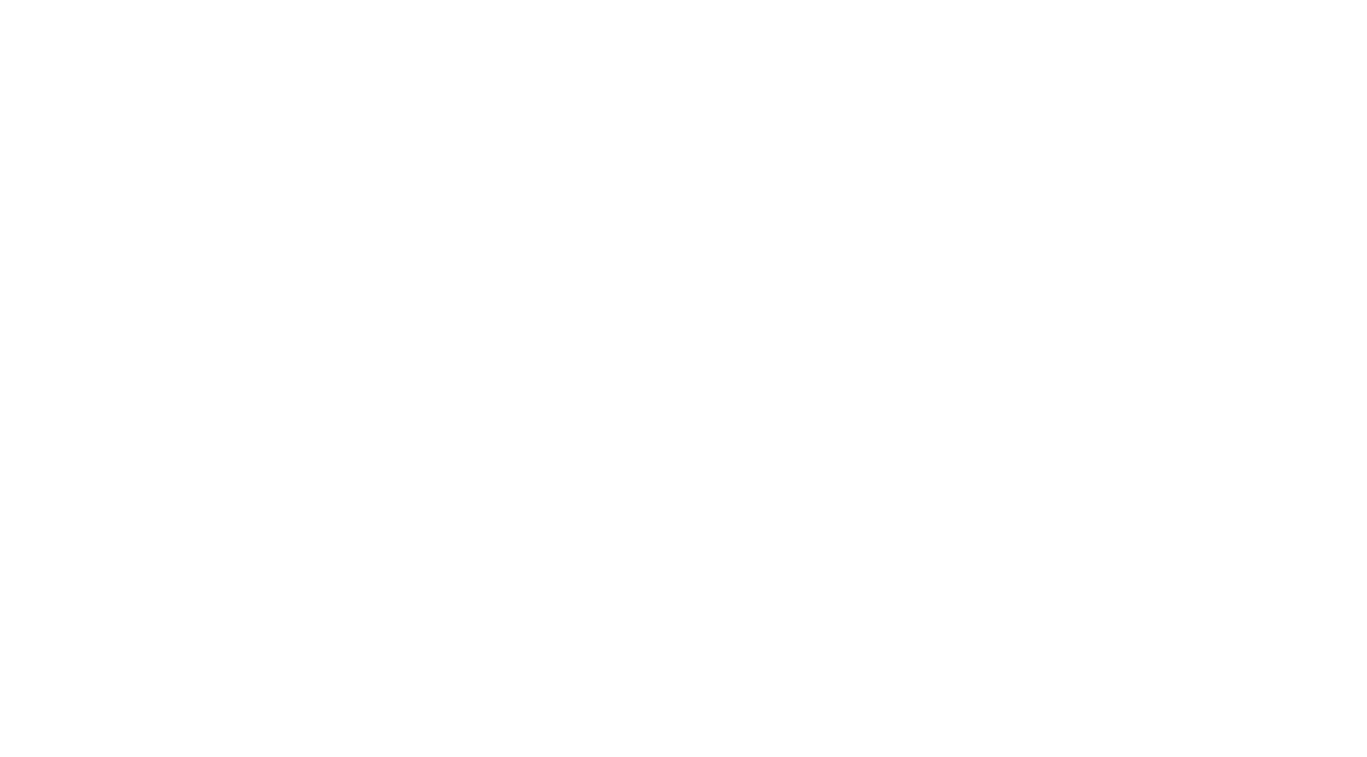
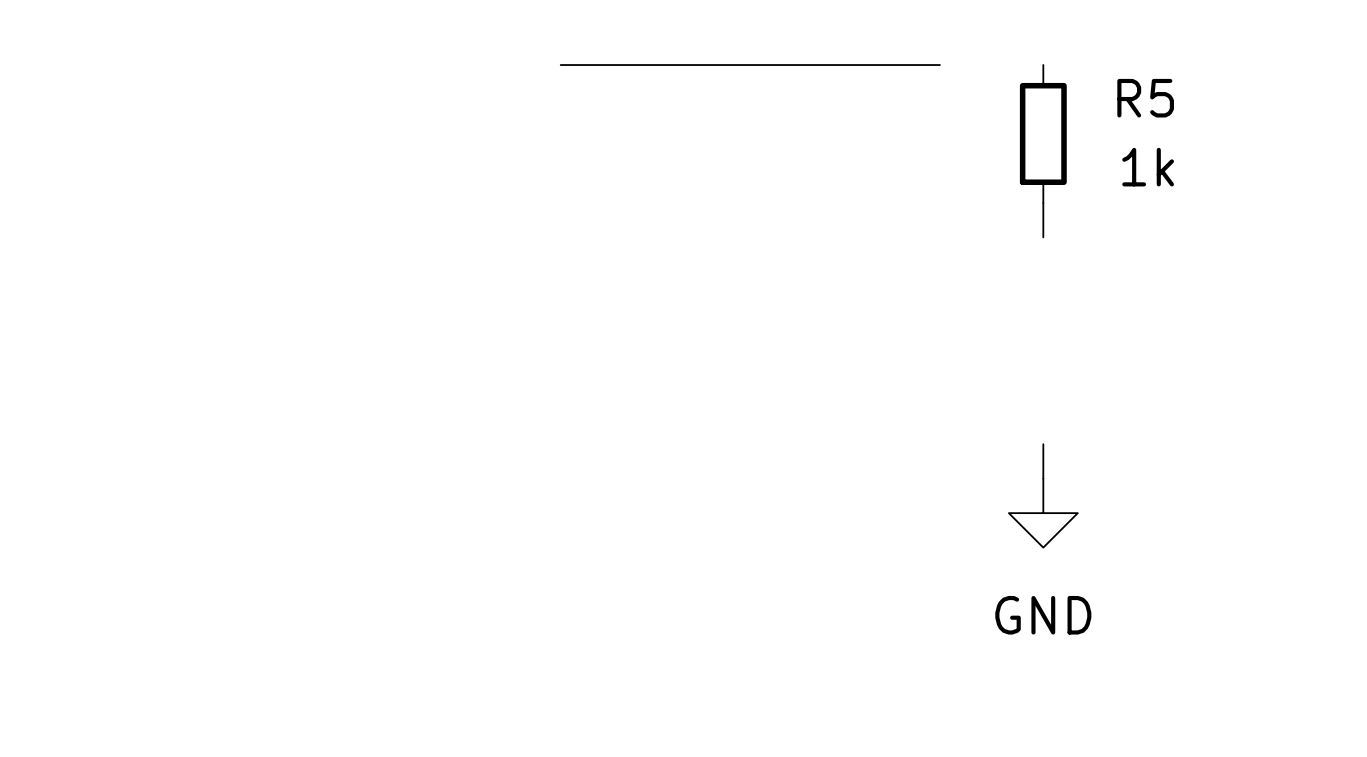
wire: none -> (560, 65) (939, 65)
R5: none -> 1k (1043, 133)
wire: none -> (1043, 202) (1043, 237)
wire: none -> (1043, 444) (1043, 478)
power symbol: none -> GND (1043, 513)

